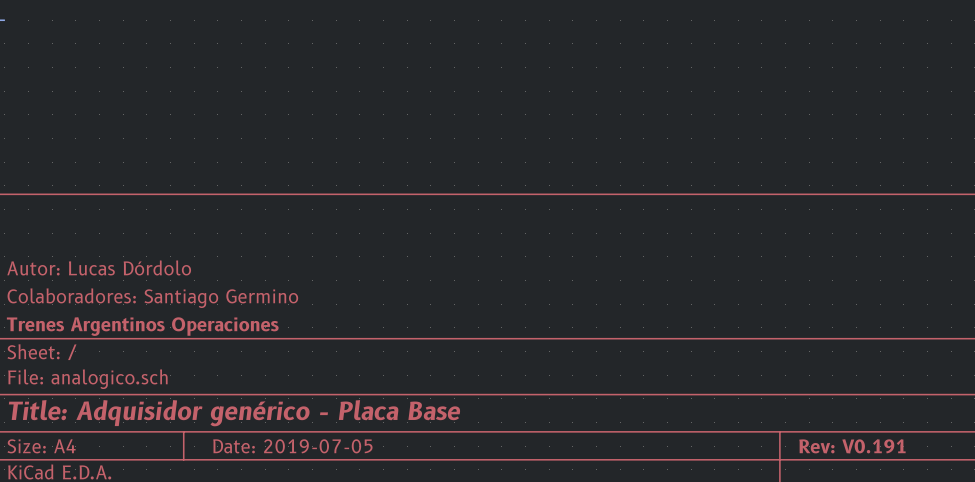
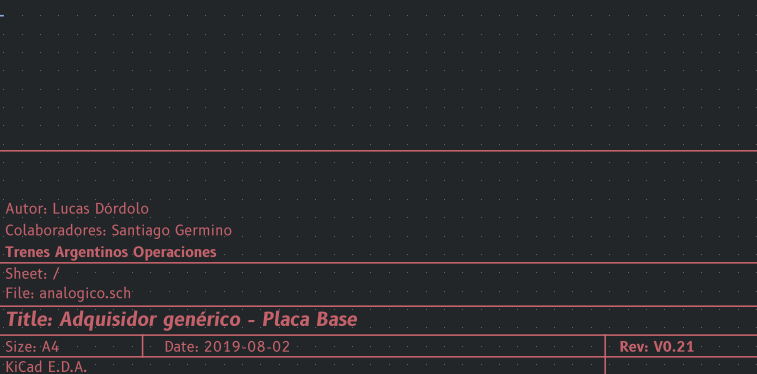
title block: Date: 2019-07-05 (292, 446) -> Date: 2019-08-02 (227, 346)
title block: Rev: V0.191 (852, 446) -> Rev: V0.21 (656, 346)

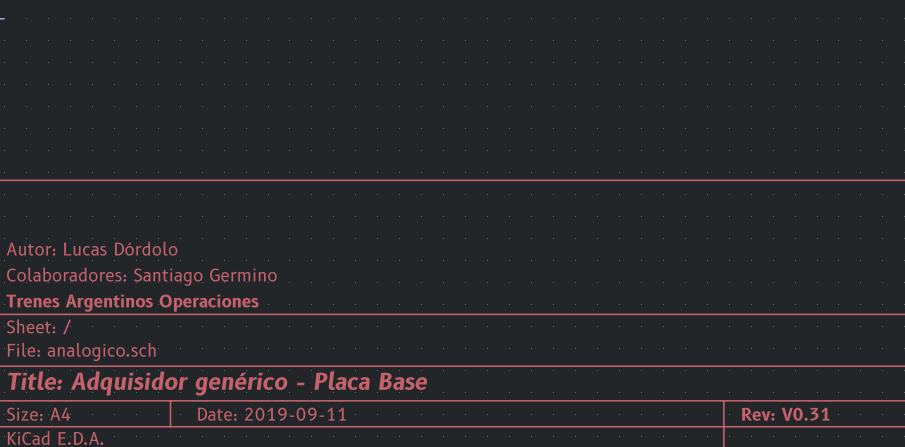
title block: Date: 2019-08-02 (227, 346) -> Date: 2019-09-11 (271, 414)
title block: Rev: V0.21 (656, 346) -> Rev: V0.31 (785, 414)

